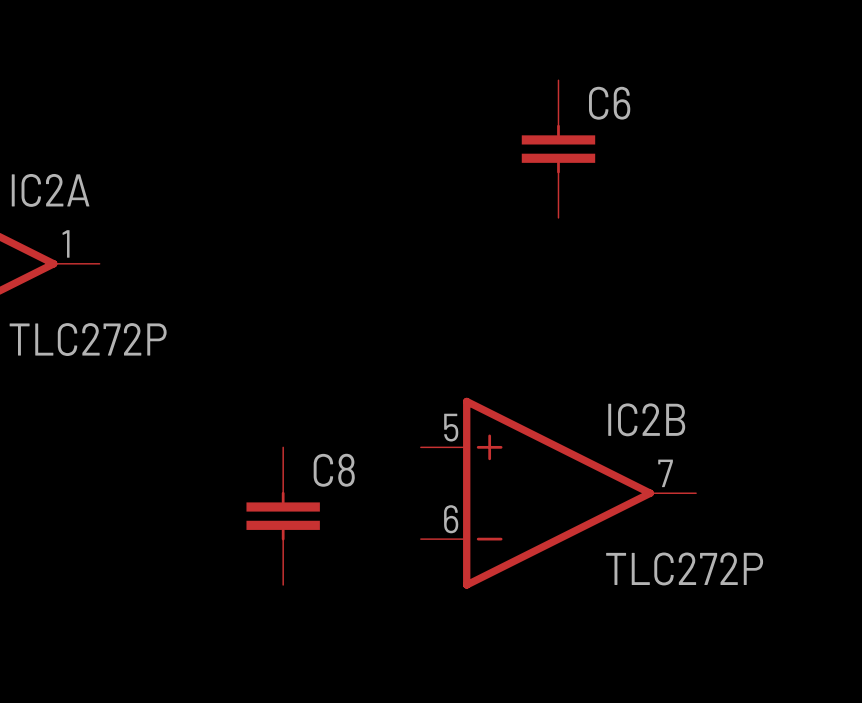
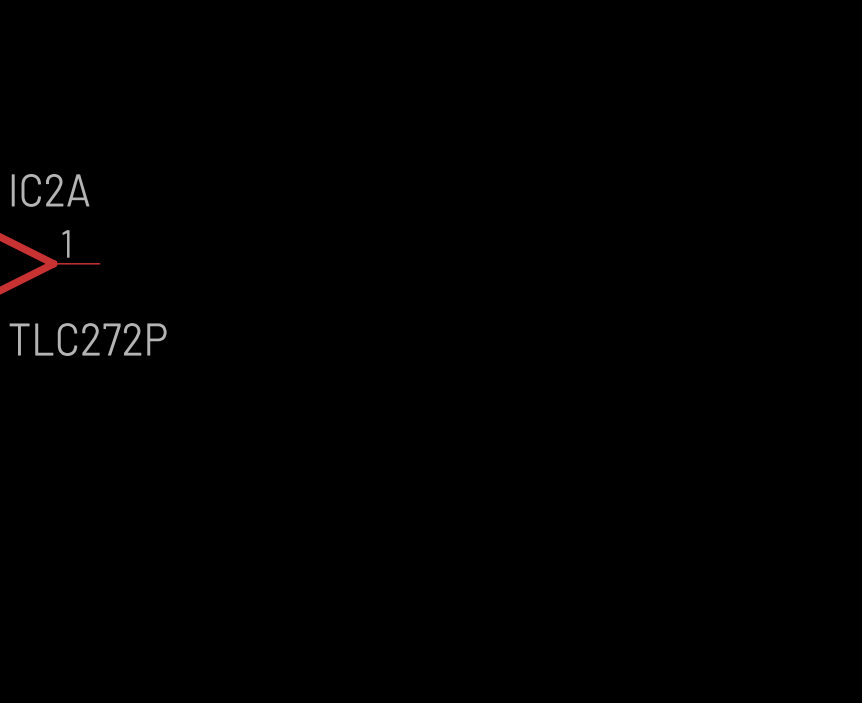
C6: (558, 149) -> none
IC2B: TLC272P (558, 493) -> none
C8: (283, 516) -> none

